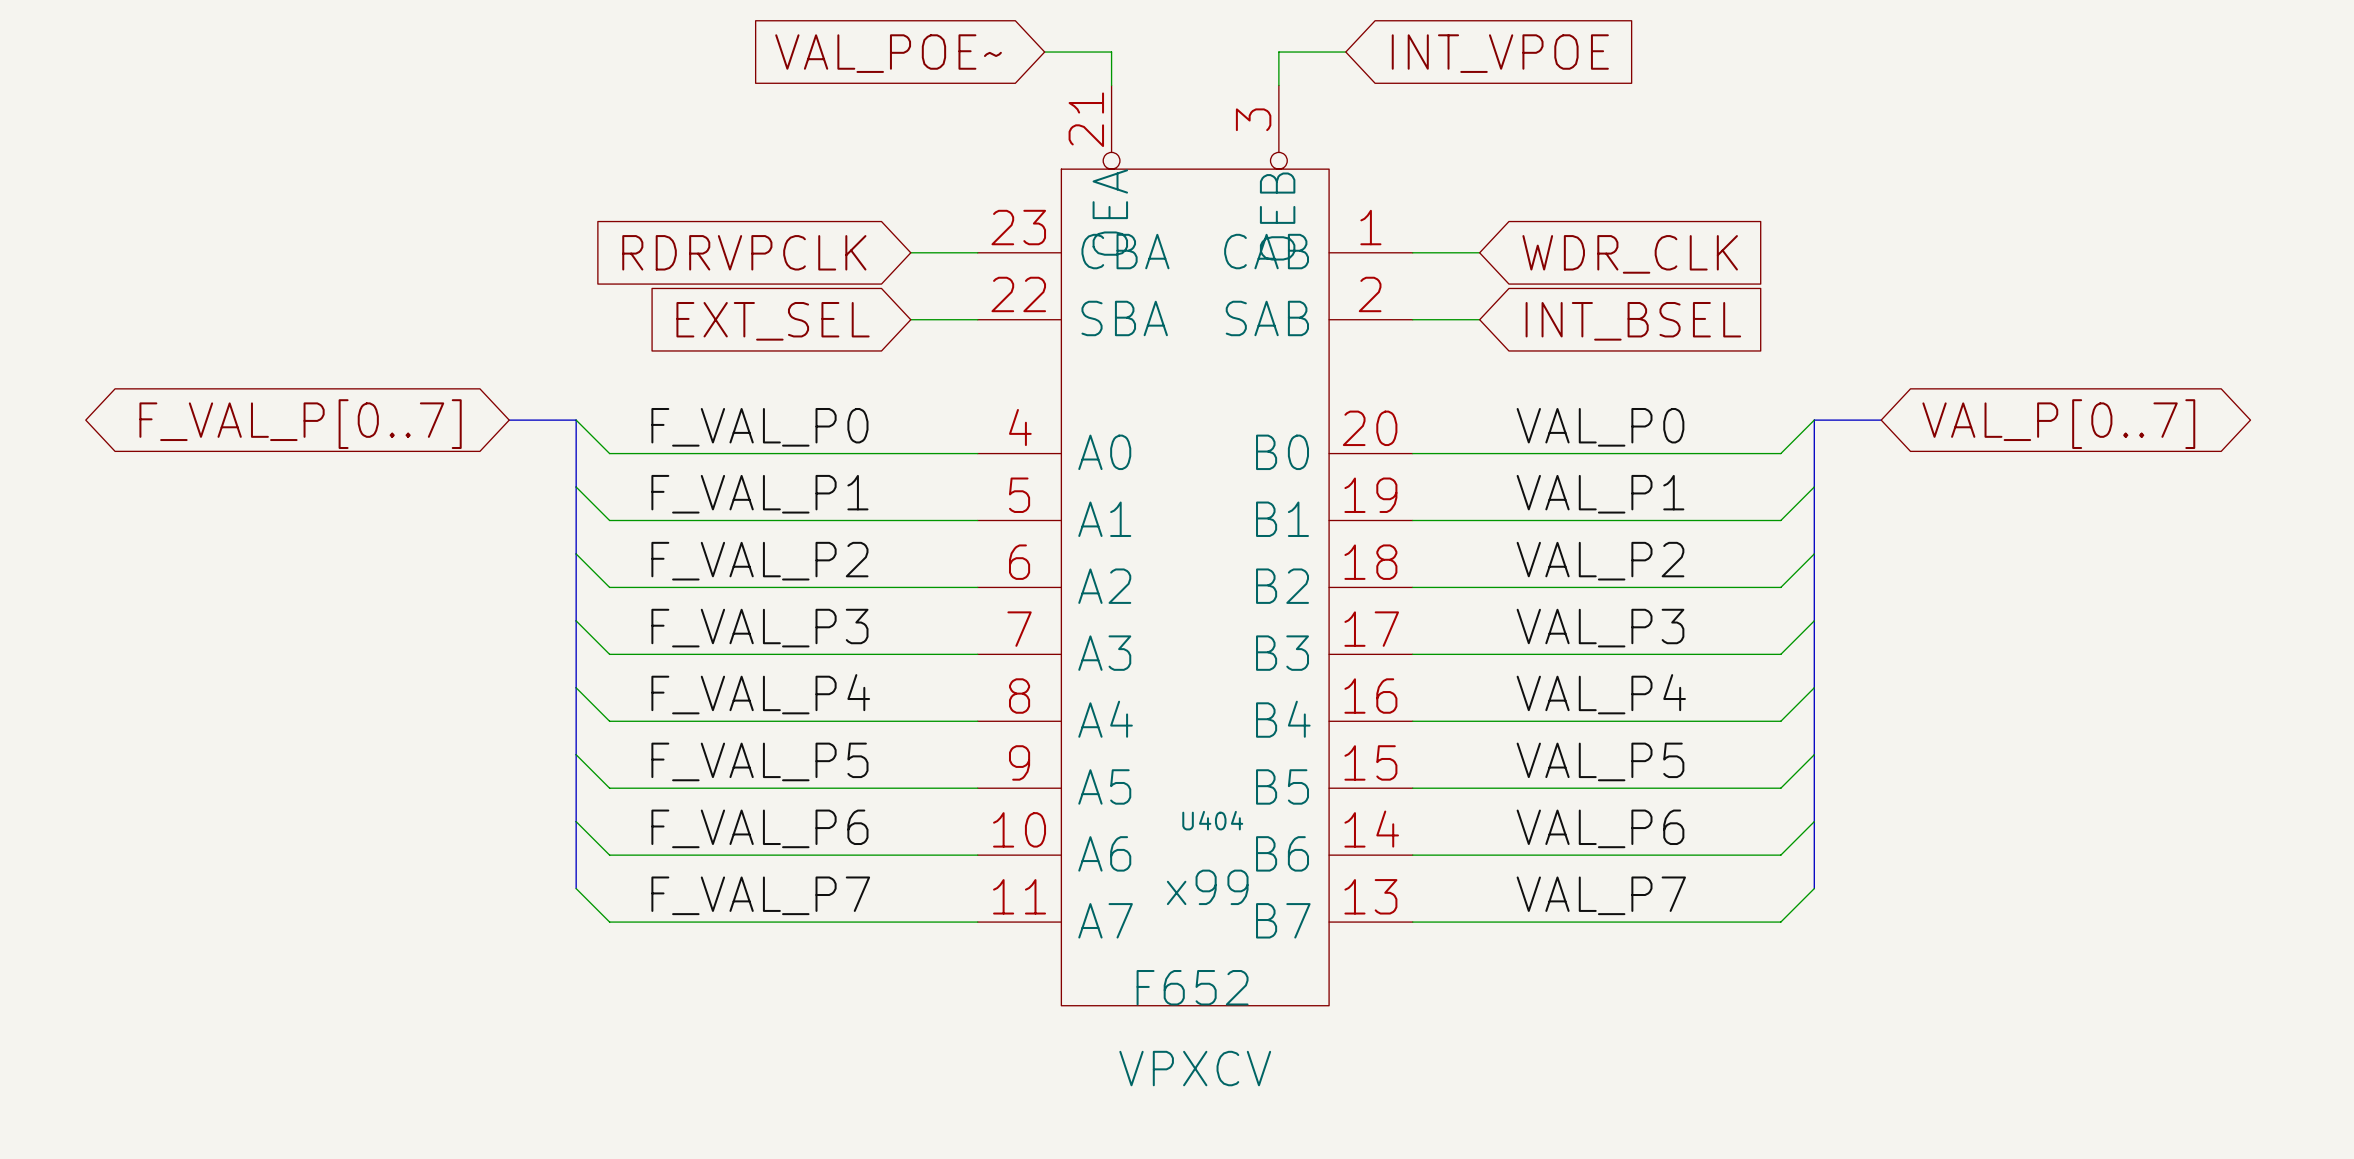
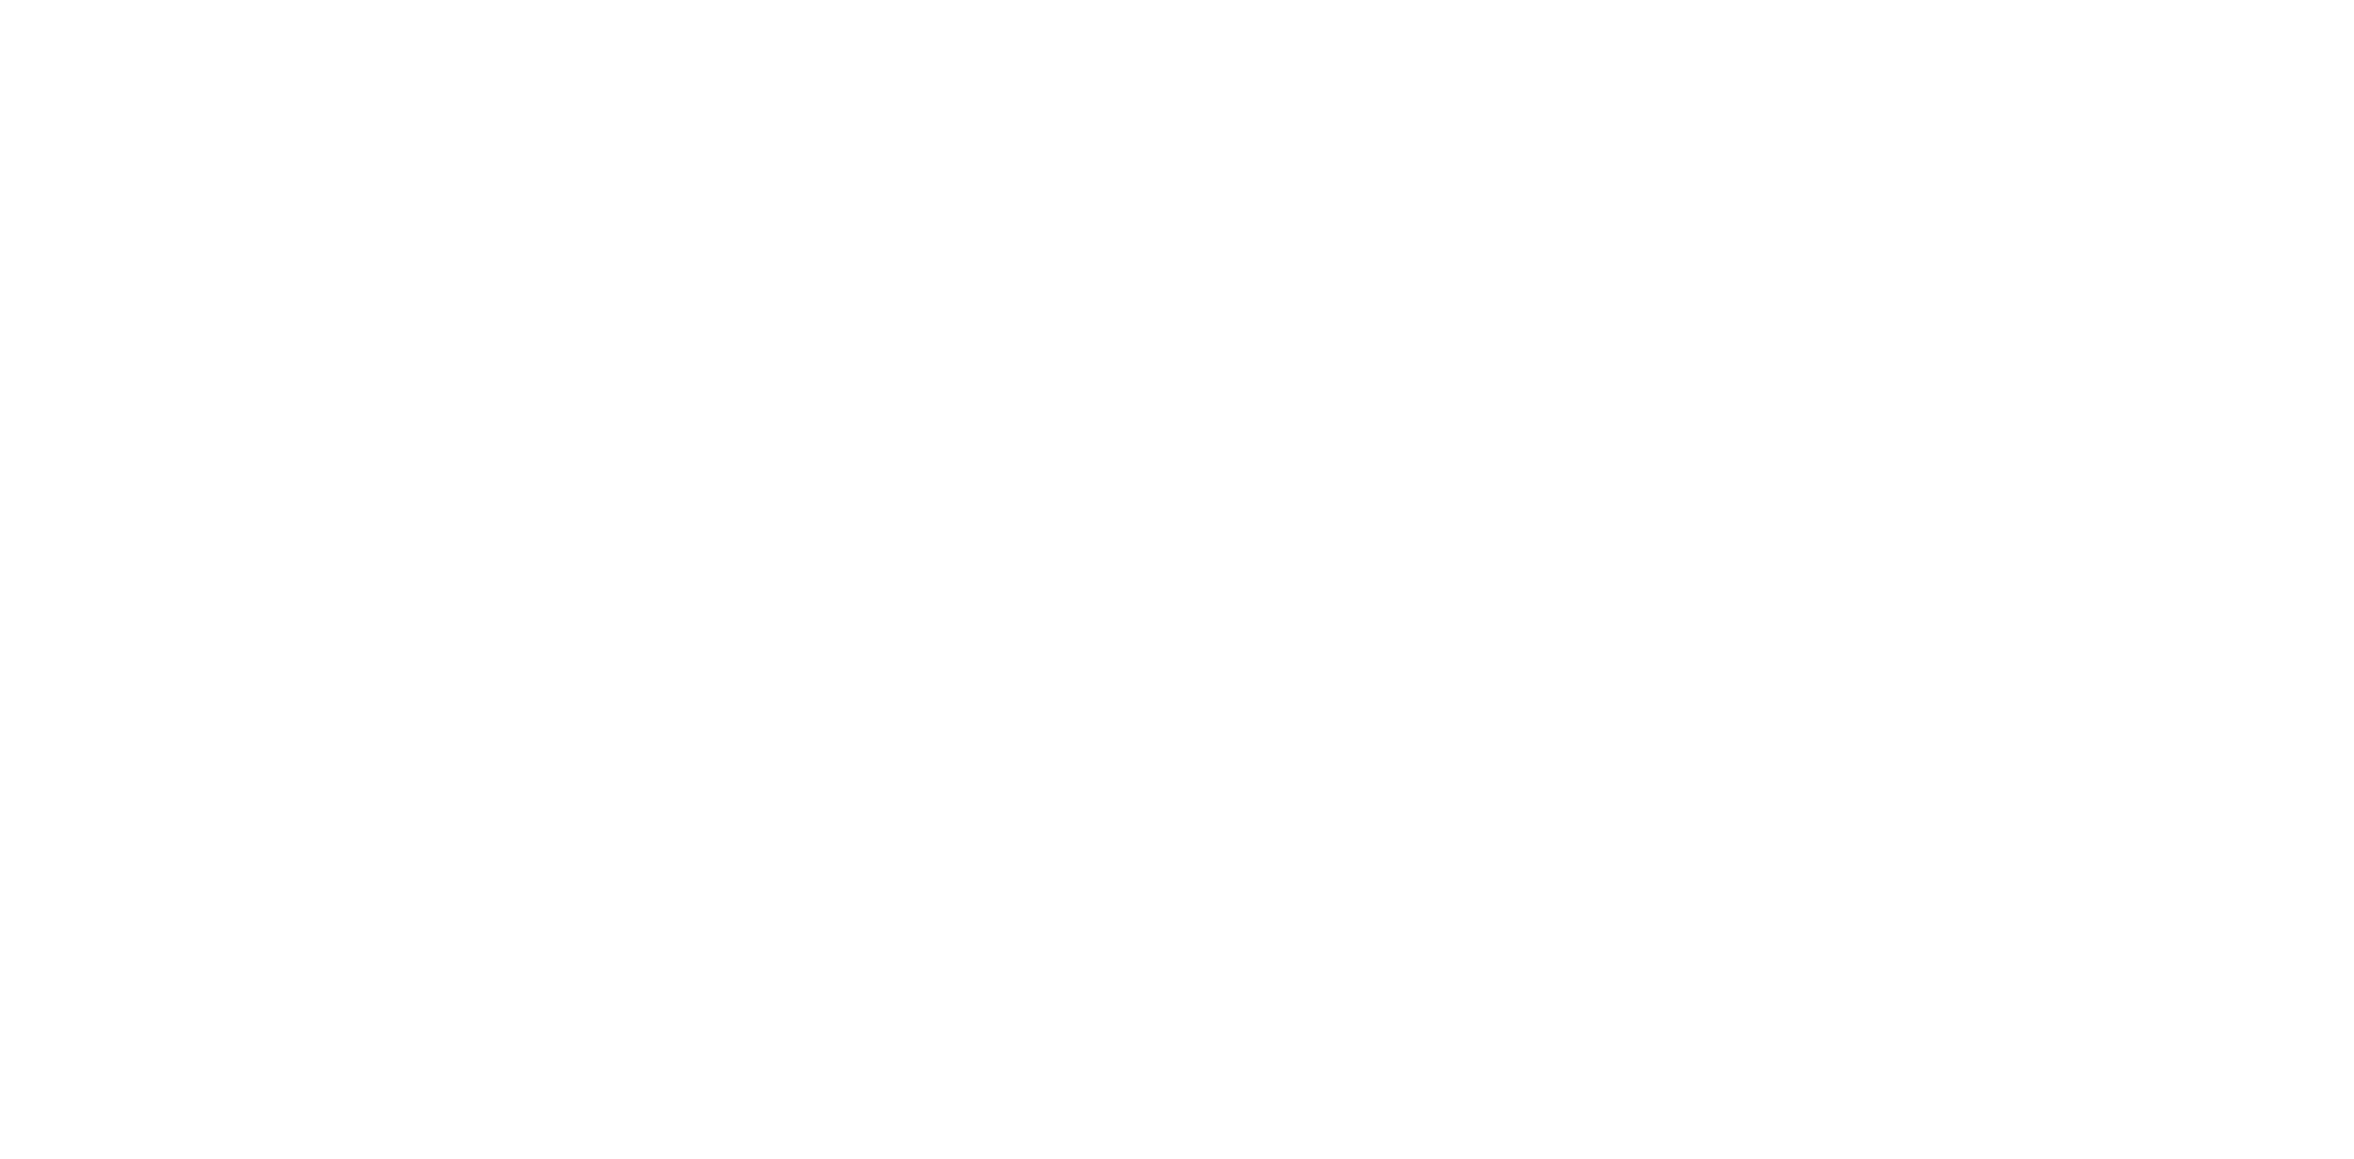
wire: (1044, 52) (1111, 52) (1111, 85) -> none
wire: (1345, 52) (1278, 52) (1278, 85) -> none
global label: VAL_POE~ (888, 53) -> none
global label: INT_VPOE (1500, 53) -> none
global label: RDRVPCLK (744, 252) -> none
wire: (910, 252) (977, 252) -> none
wire: (1412, 252) (1479, 252) -> none
global label: WDR_CLK (1630, 254) -> none
wire: (910, 319) (977, 319) -> none
wire: (1412, 319) (1479, 319) -> none
global label: EXT_SEL (773, 321) -> none
global label: INT_BSEL (1633, 321) -> none
bus: (509, 420) (576, 420) (576, 888) -> none
wire: (576, 420) (609, 453) (977, 453) -> none
wire: (1814, 420) (1780, 453) (1412, 453) -> none
bus: (1881, 420) (1814, 420) (1814, 888) -> none
global label: F_VAL_P[0..7] (300, 424) -> none
global label: VAL_P[0..7] (2058, 424) -> none
label: F_VAL_P0 (759, 427) -> none
label: VAL_P0 (1600, 427) -> none
wire: (576, 487) (609, 520) (977, 520) -> none
wire: (1814, 487) (1780, 520) (1412, 520) -> none
label: F_VAL_P1 (759, 494) -> none
label: VAL_P1 (1600, 494) -> none
U404: F652 (1195, 545) -> none
wire: (576, 553) (609, 587) (977, 587) -> none
wire: (1814, 553) (1780, 587) (1412, 587) -> none
label: F_VAL_P2 (759, 561) -> none
label: VAL_P2 (1600, 561) -> none
wire: (576, 620) (609, 654) (977, 654) -> none
wire: (1814, 620) (1780, 654) (1412, 654) -> none
label: F_VAL_P3 (759, 628) -> none
label: VAL_P3 (1600, 628) -> none
wire: (576, 687) (609, 721) (977, 721) -> none
wire: (1814, 687) (1780, 721) (1412, 721) -> none
label: F_VAL_P4 (760, 694) -> none
label: VAL_P4 (1601, 694) -> none
wire: (576, 754) (609, 788) (977, 788) -> none
wire: (1814, 754) (1780, 788) (1412, 788) -> none
label: F_VAL_P5 (759, 761) -> none
label: VAL_P5 (1600, 761) -> none
wire: (576, 821) (609, 855) (977, 855) -> none
wire: (1814, 821) (1780, 855) (1412, 855) -> none
label: F_VAL_P6 (759, 828) -> none
label: VAL_P6 (1600, 828) -> none
wire: (576, 888) (609, 922) (977, 922) -> none
wire: (1814, 888) (1780, 922) (1412, 922) -> none
label: F_VAL_P7 (760, 895) -> none
label: VAL_P7 (1601, 895) -> none

